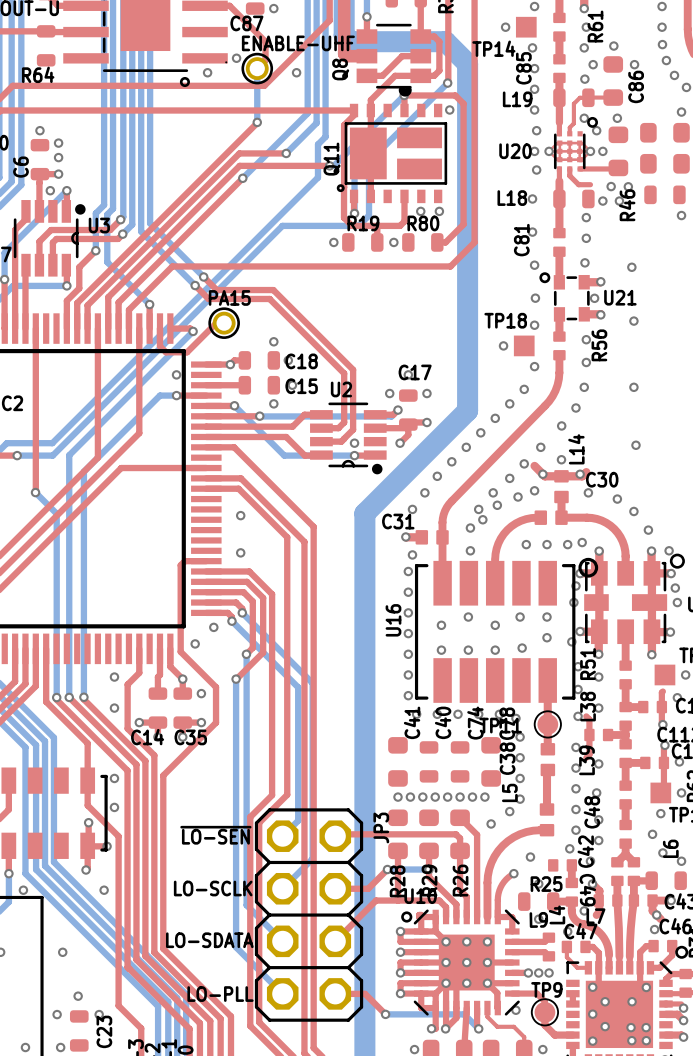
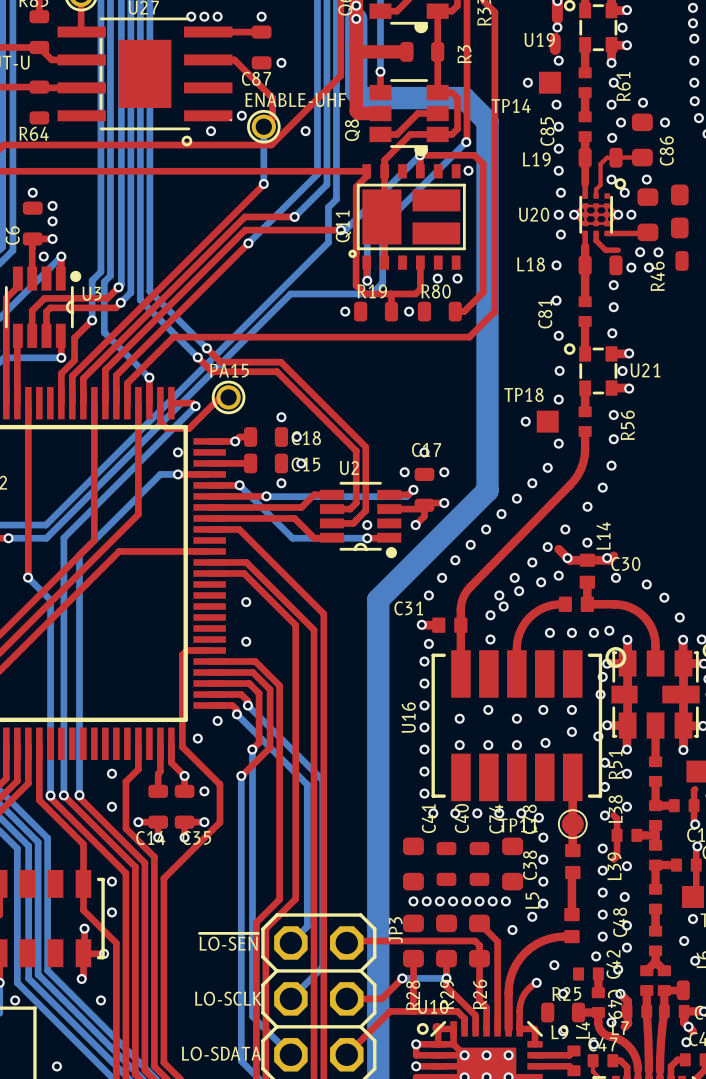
via: (631, 267) -> none
via: (633, 321) -> none
via: (633, 387) -> none
via: (635, 445) -> none

